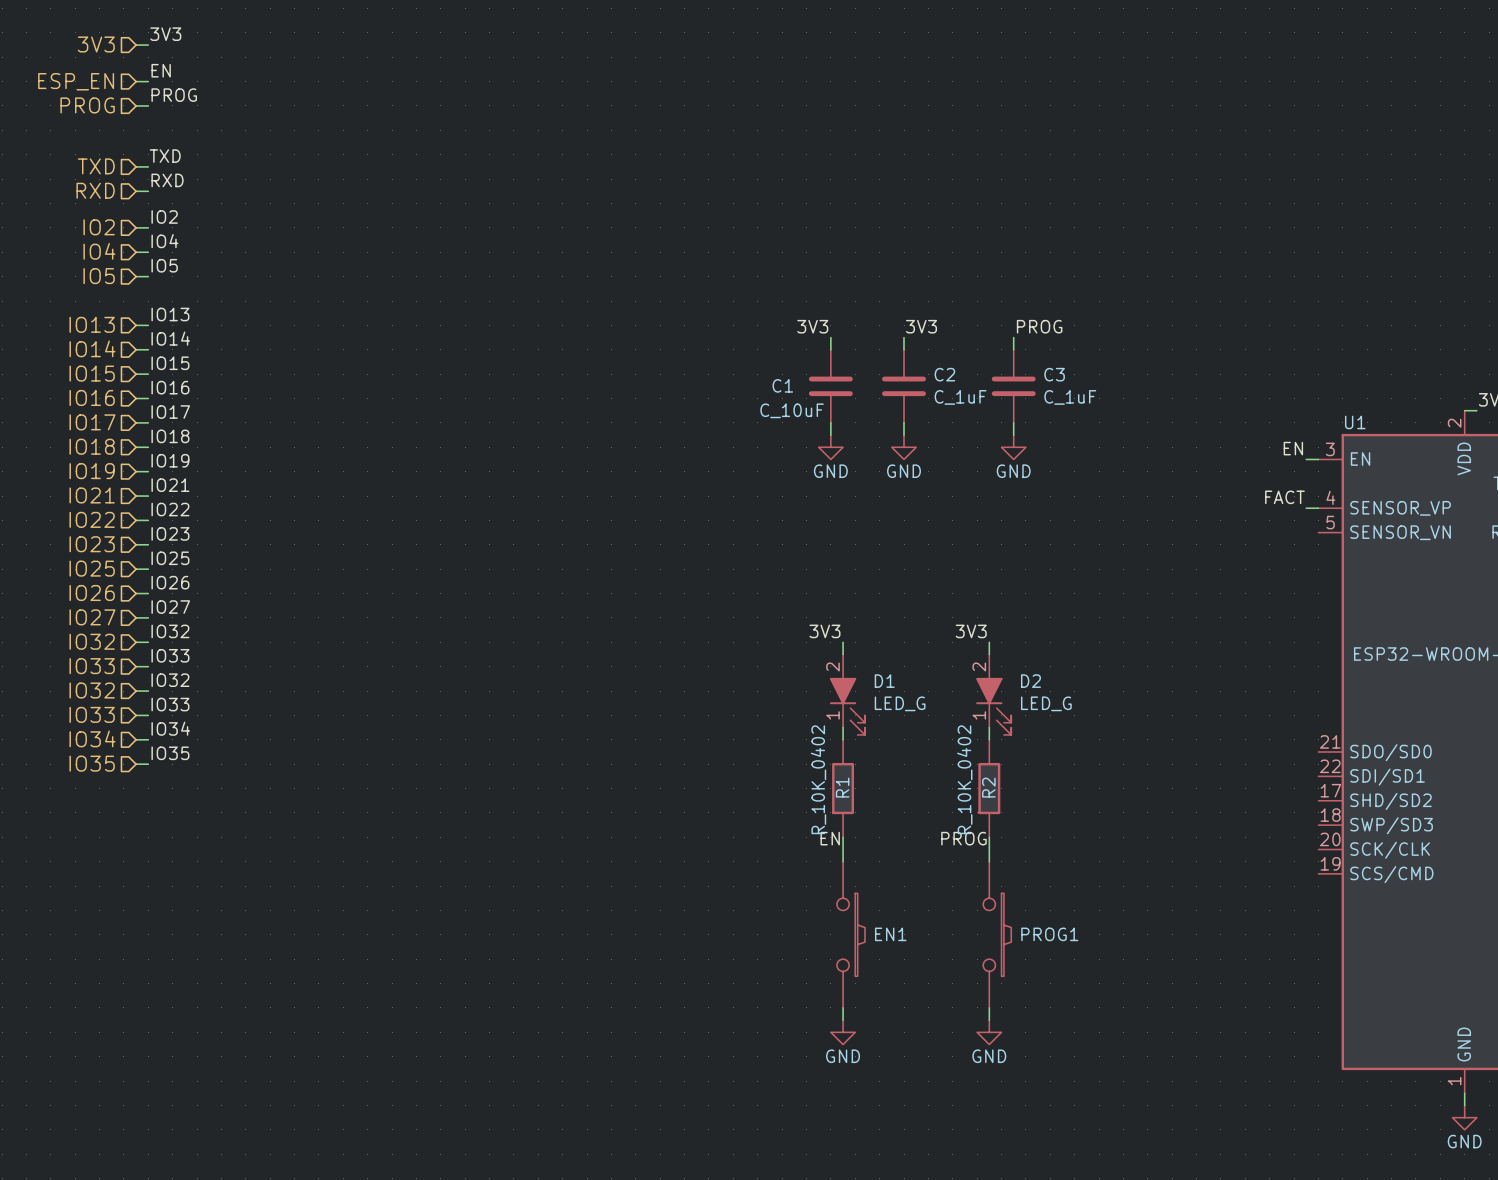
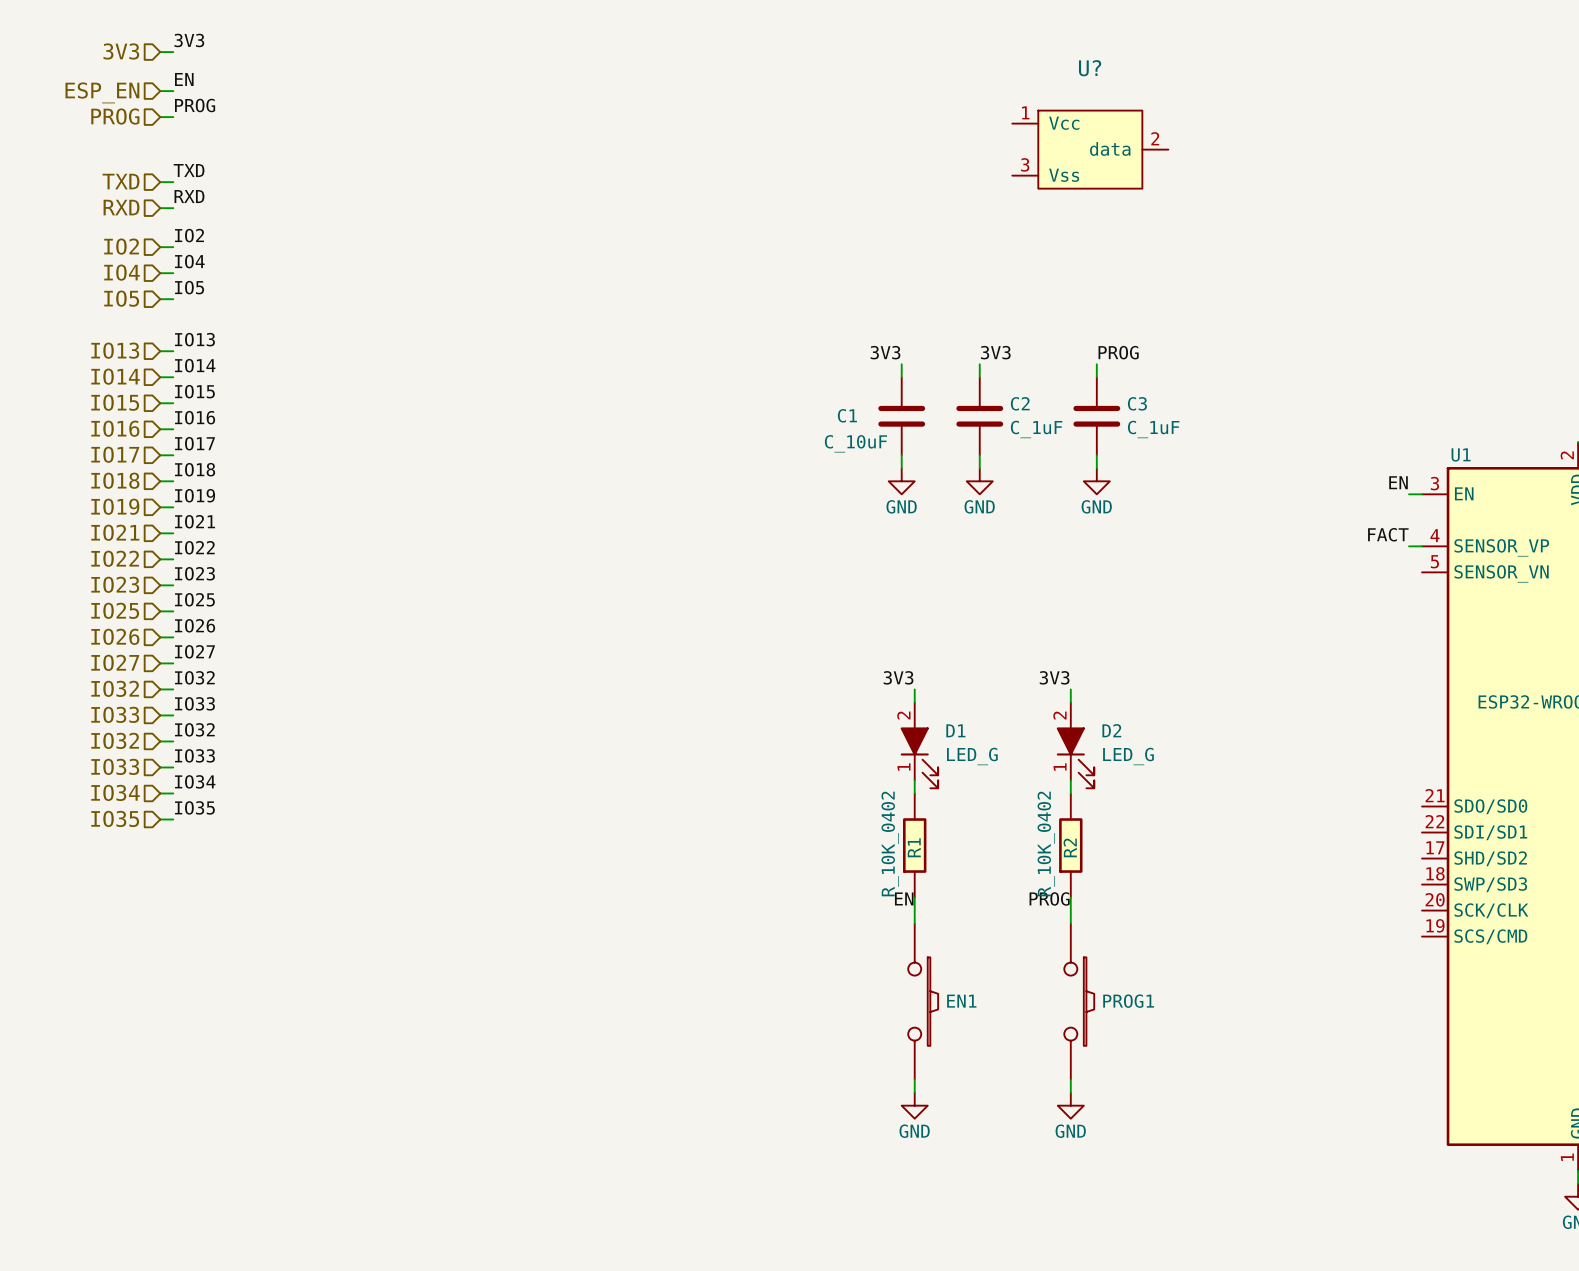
U?: none -> (1090, 149)

